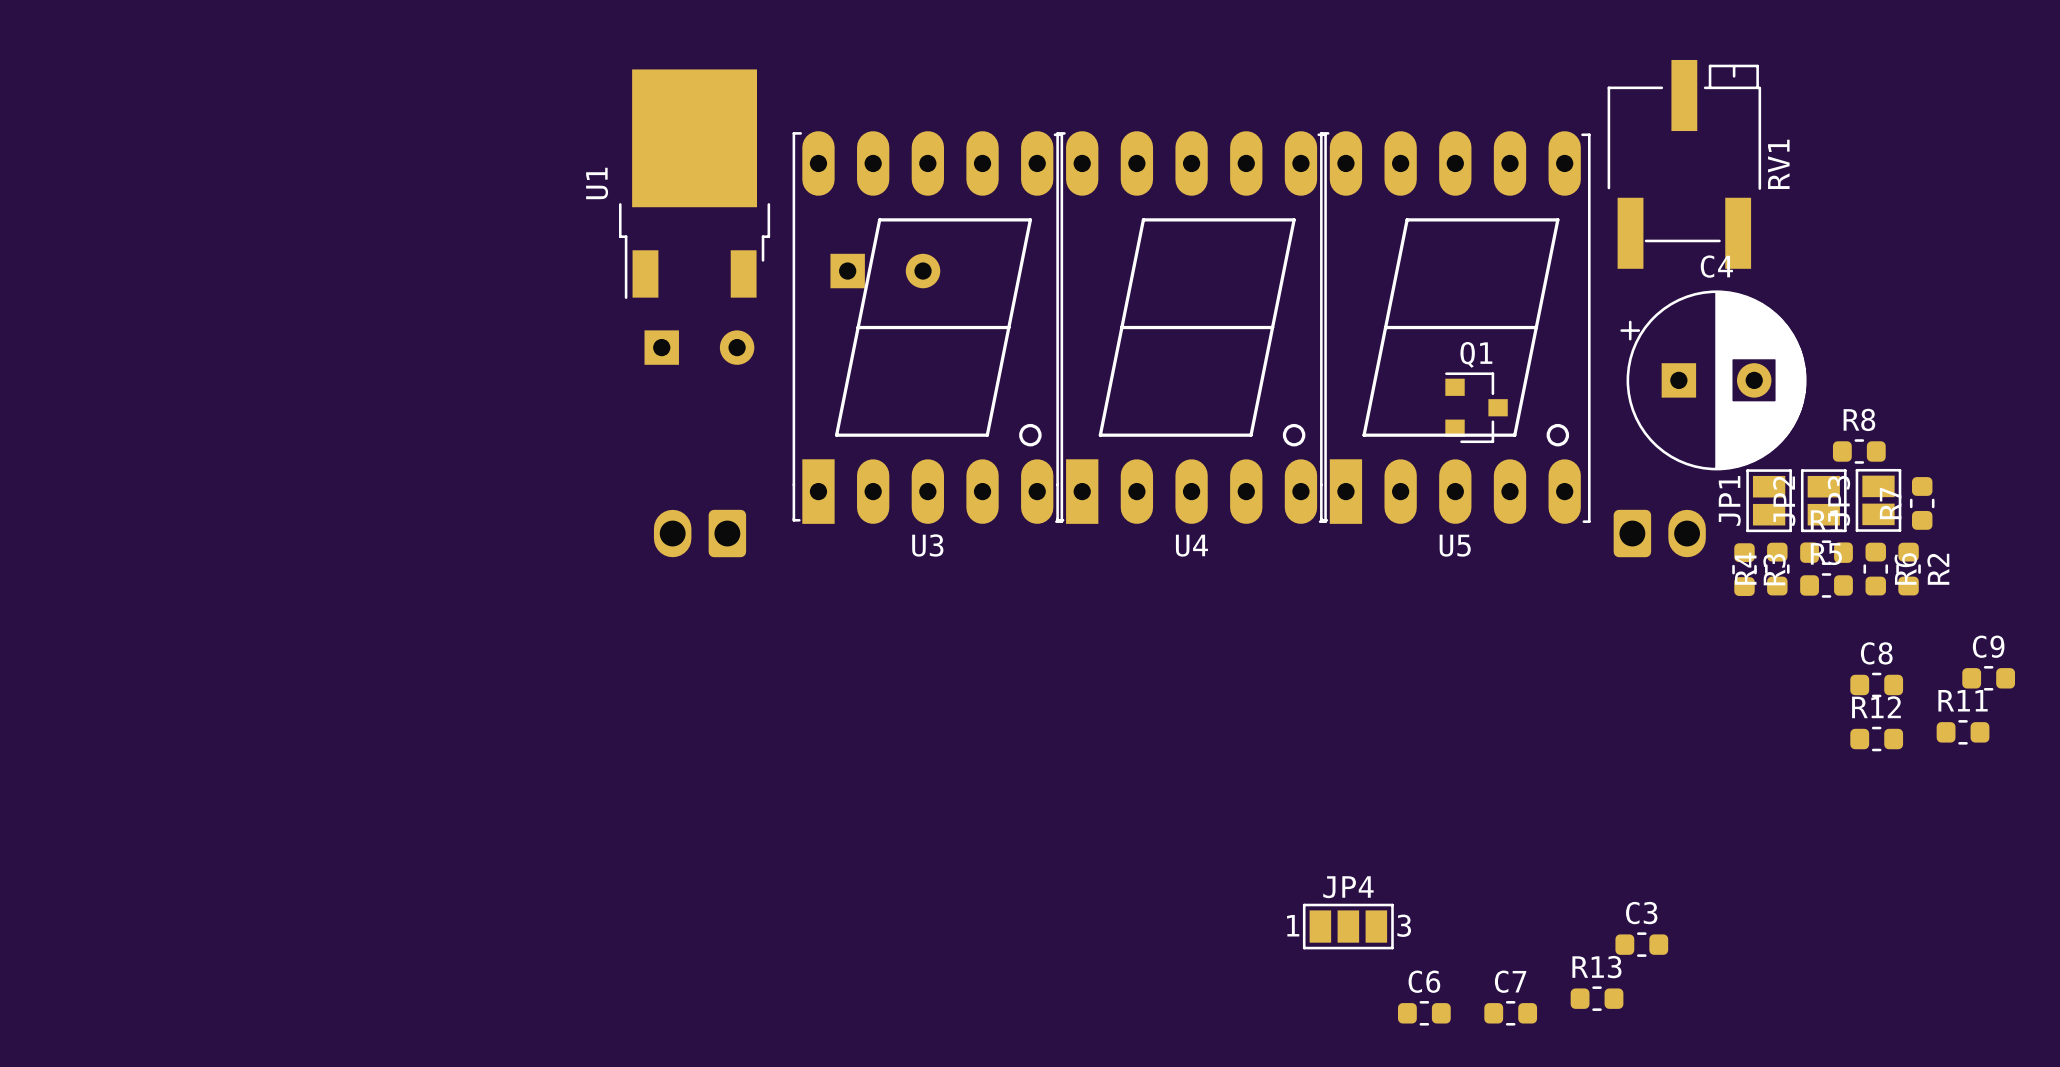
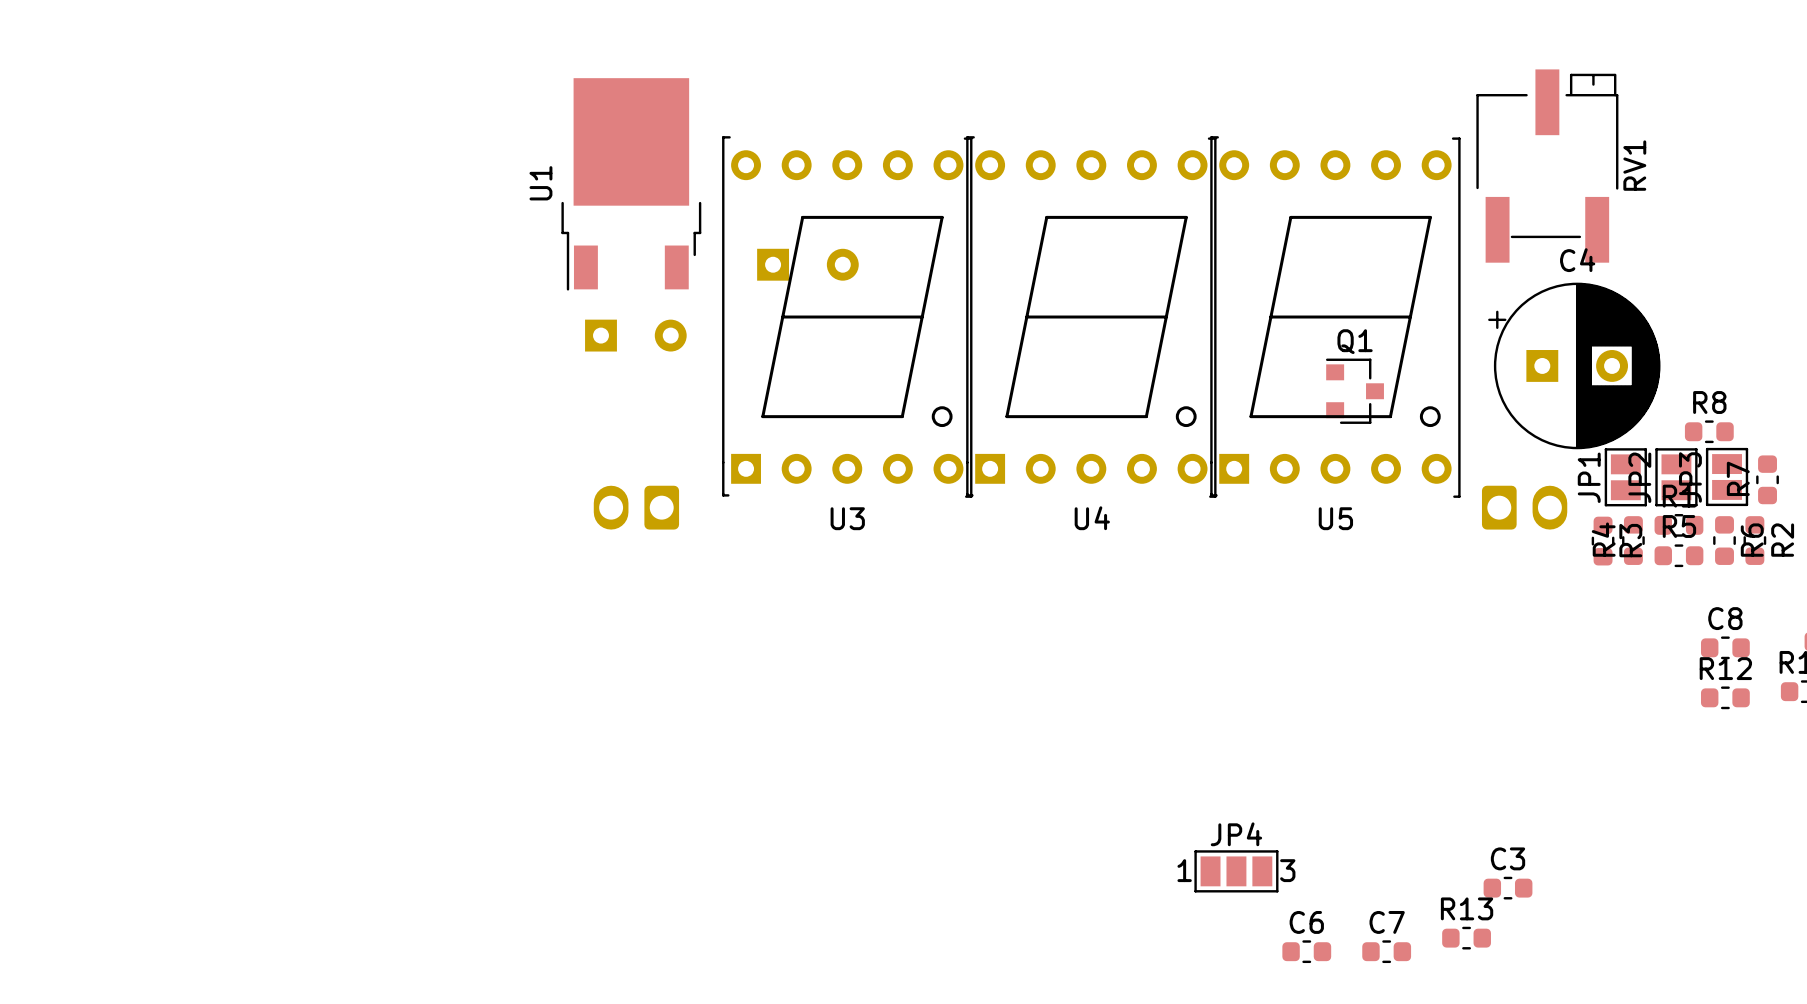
U3 footprint: [792, 131, 1064, 524] -> [722, 136, 973, 498]
U4 footprint: [1056, 131, 1327, 524] -> [966, 136, 1217, 498]
U5 footprint: [1320, 131, 1591, 524] -> [1210, 136, 1461, 498]

